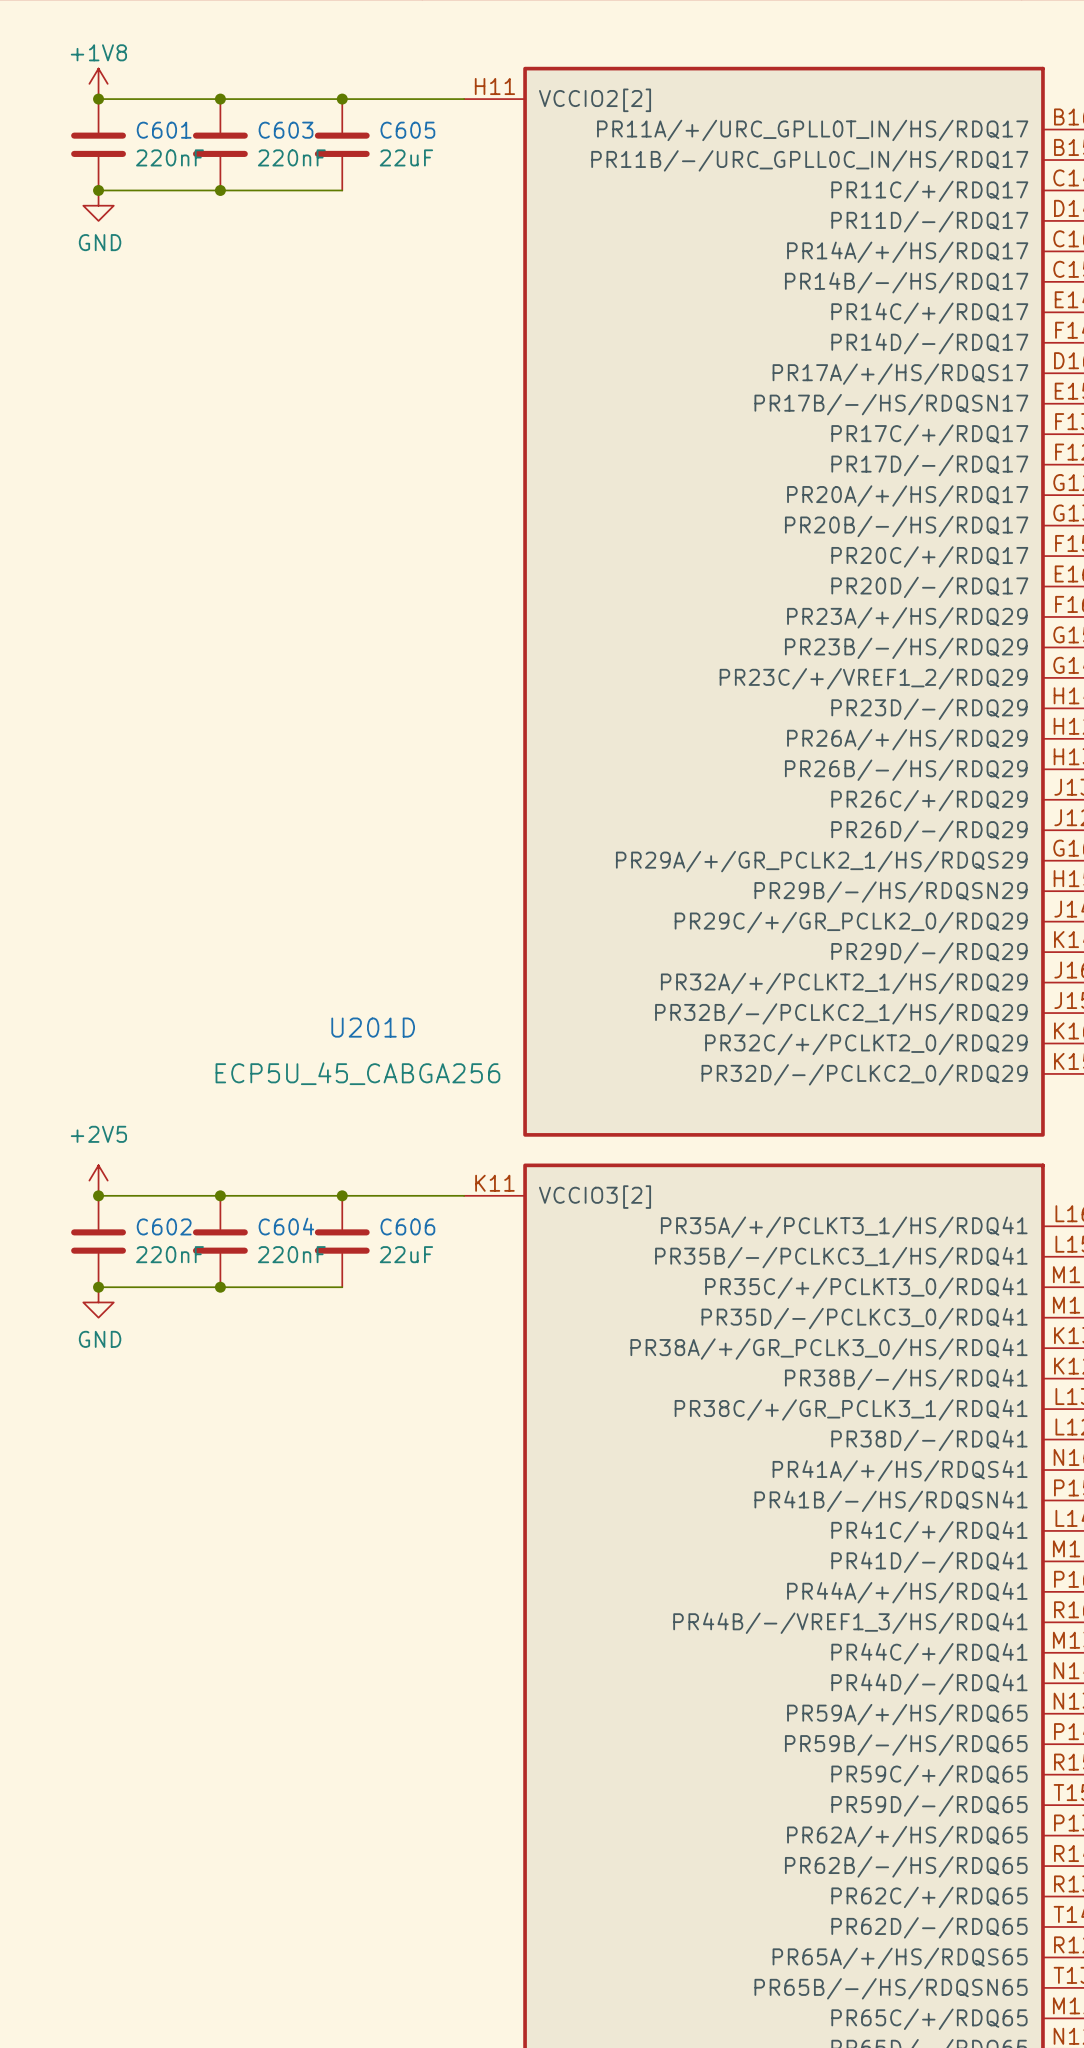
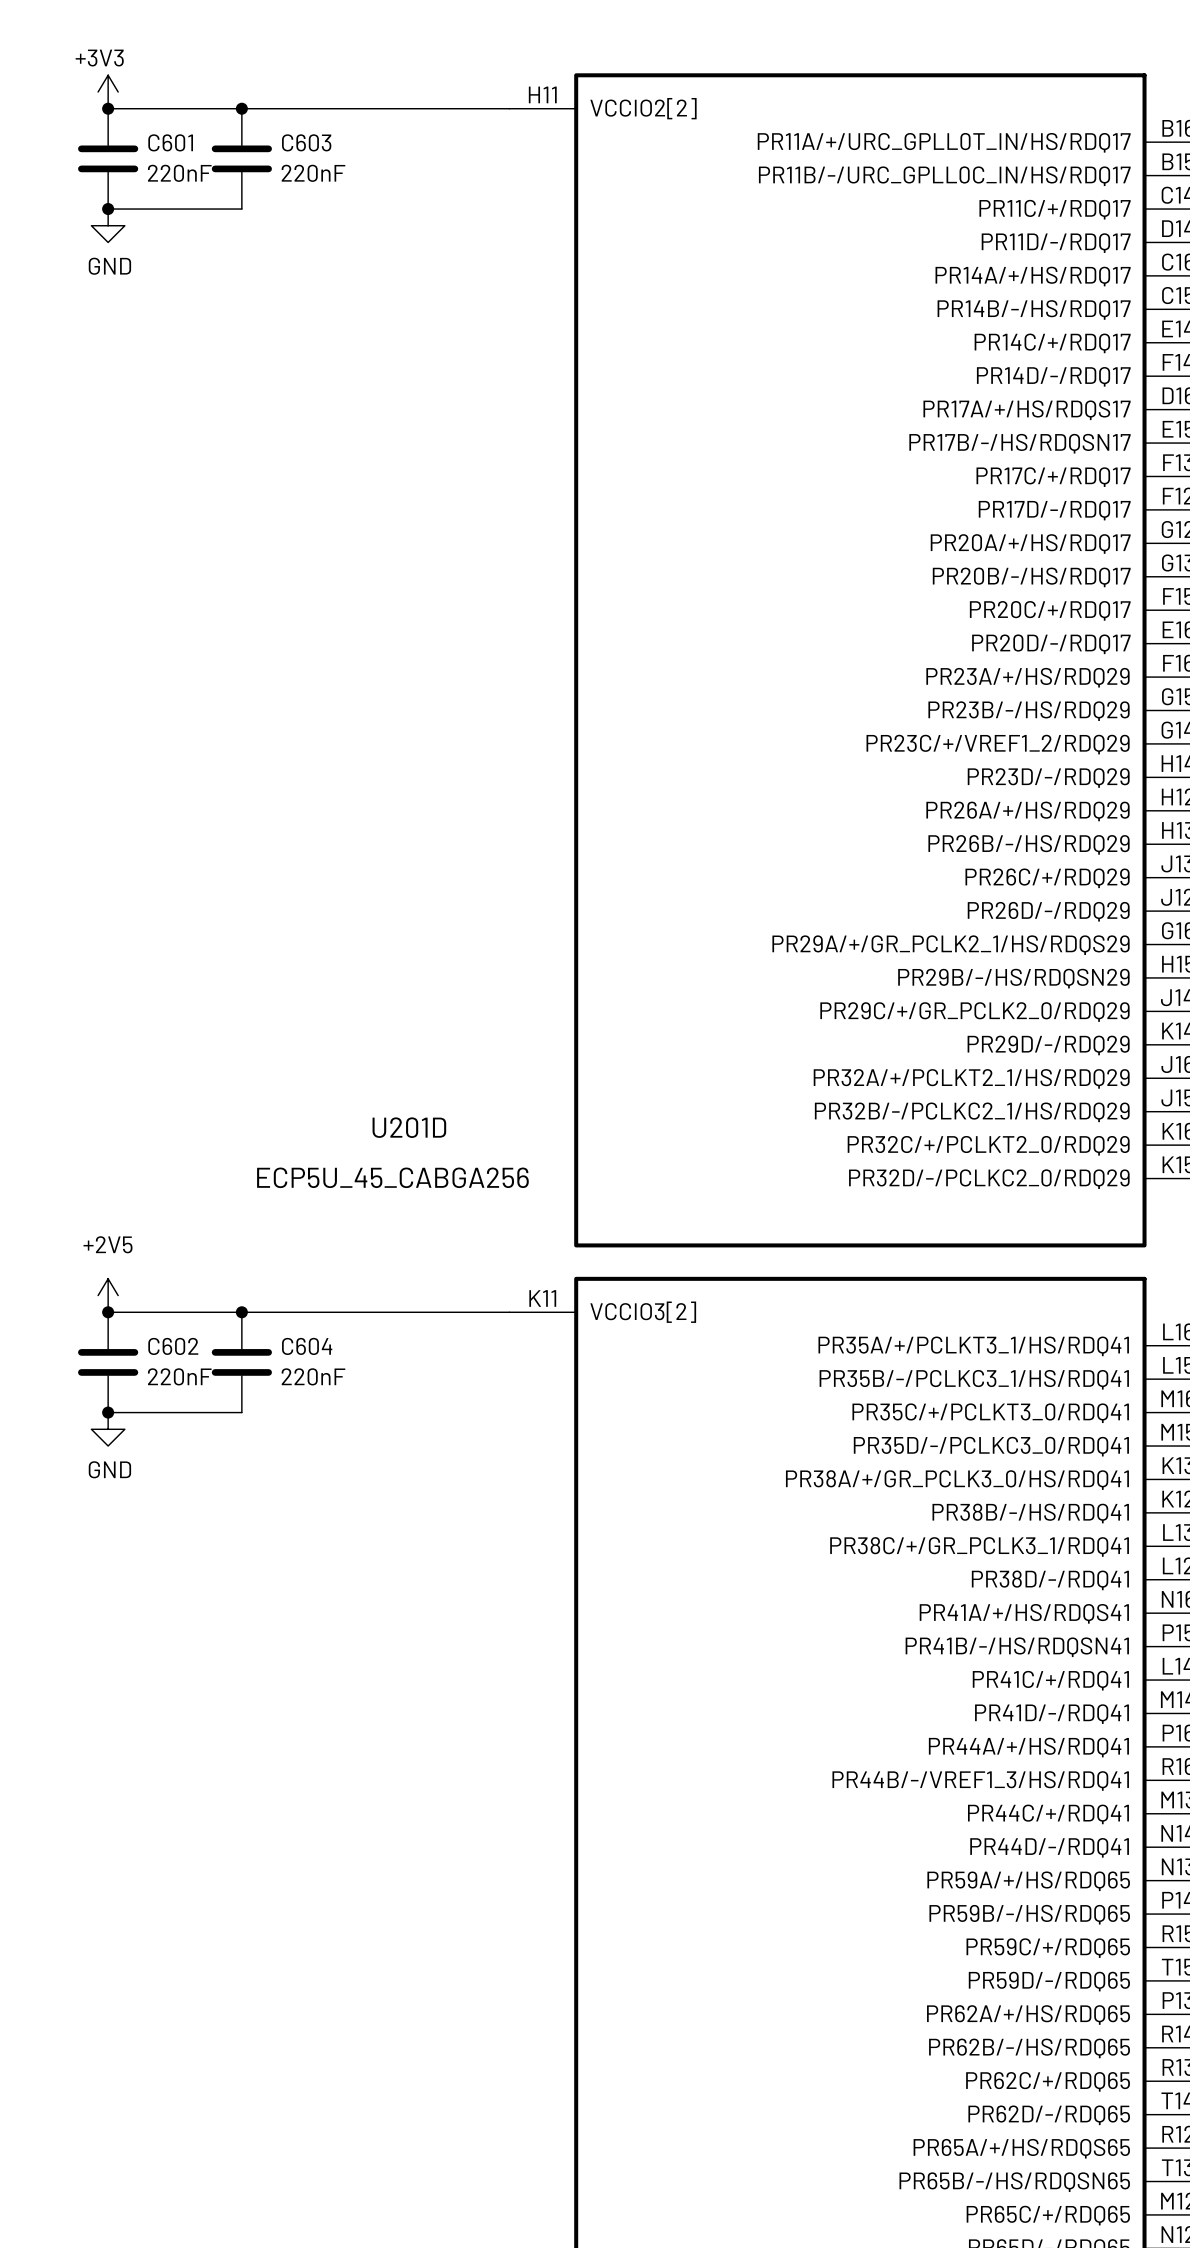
power symbol: +1V8 (98, 83) -> +3V3 (108, 92)
junction: (342, 99) -> none
C605: 22uF (342, 144) -> none
wire: (220, 190) (342, 190) -> none
junction: (220, 190) -> none
junction: (342, 1195) -> none
C606: 22uF (342, 1241) -> none
wire: (220, 1287) (342, 1287) -> none
junction: (220, 1287) -> none

